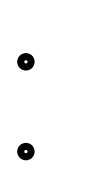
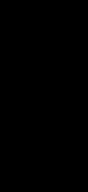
part: (25, 61) -> none
part: (25, 151) -> none

